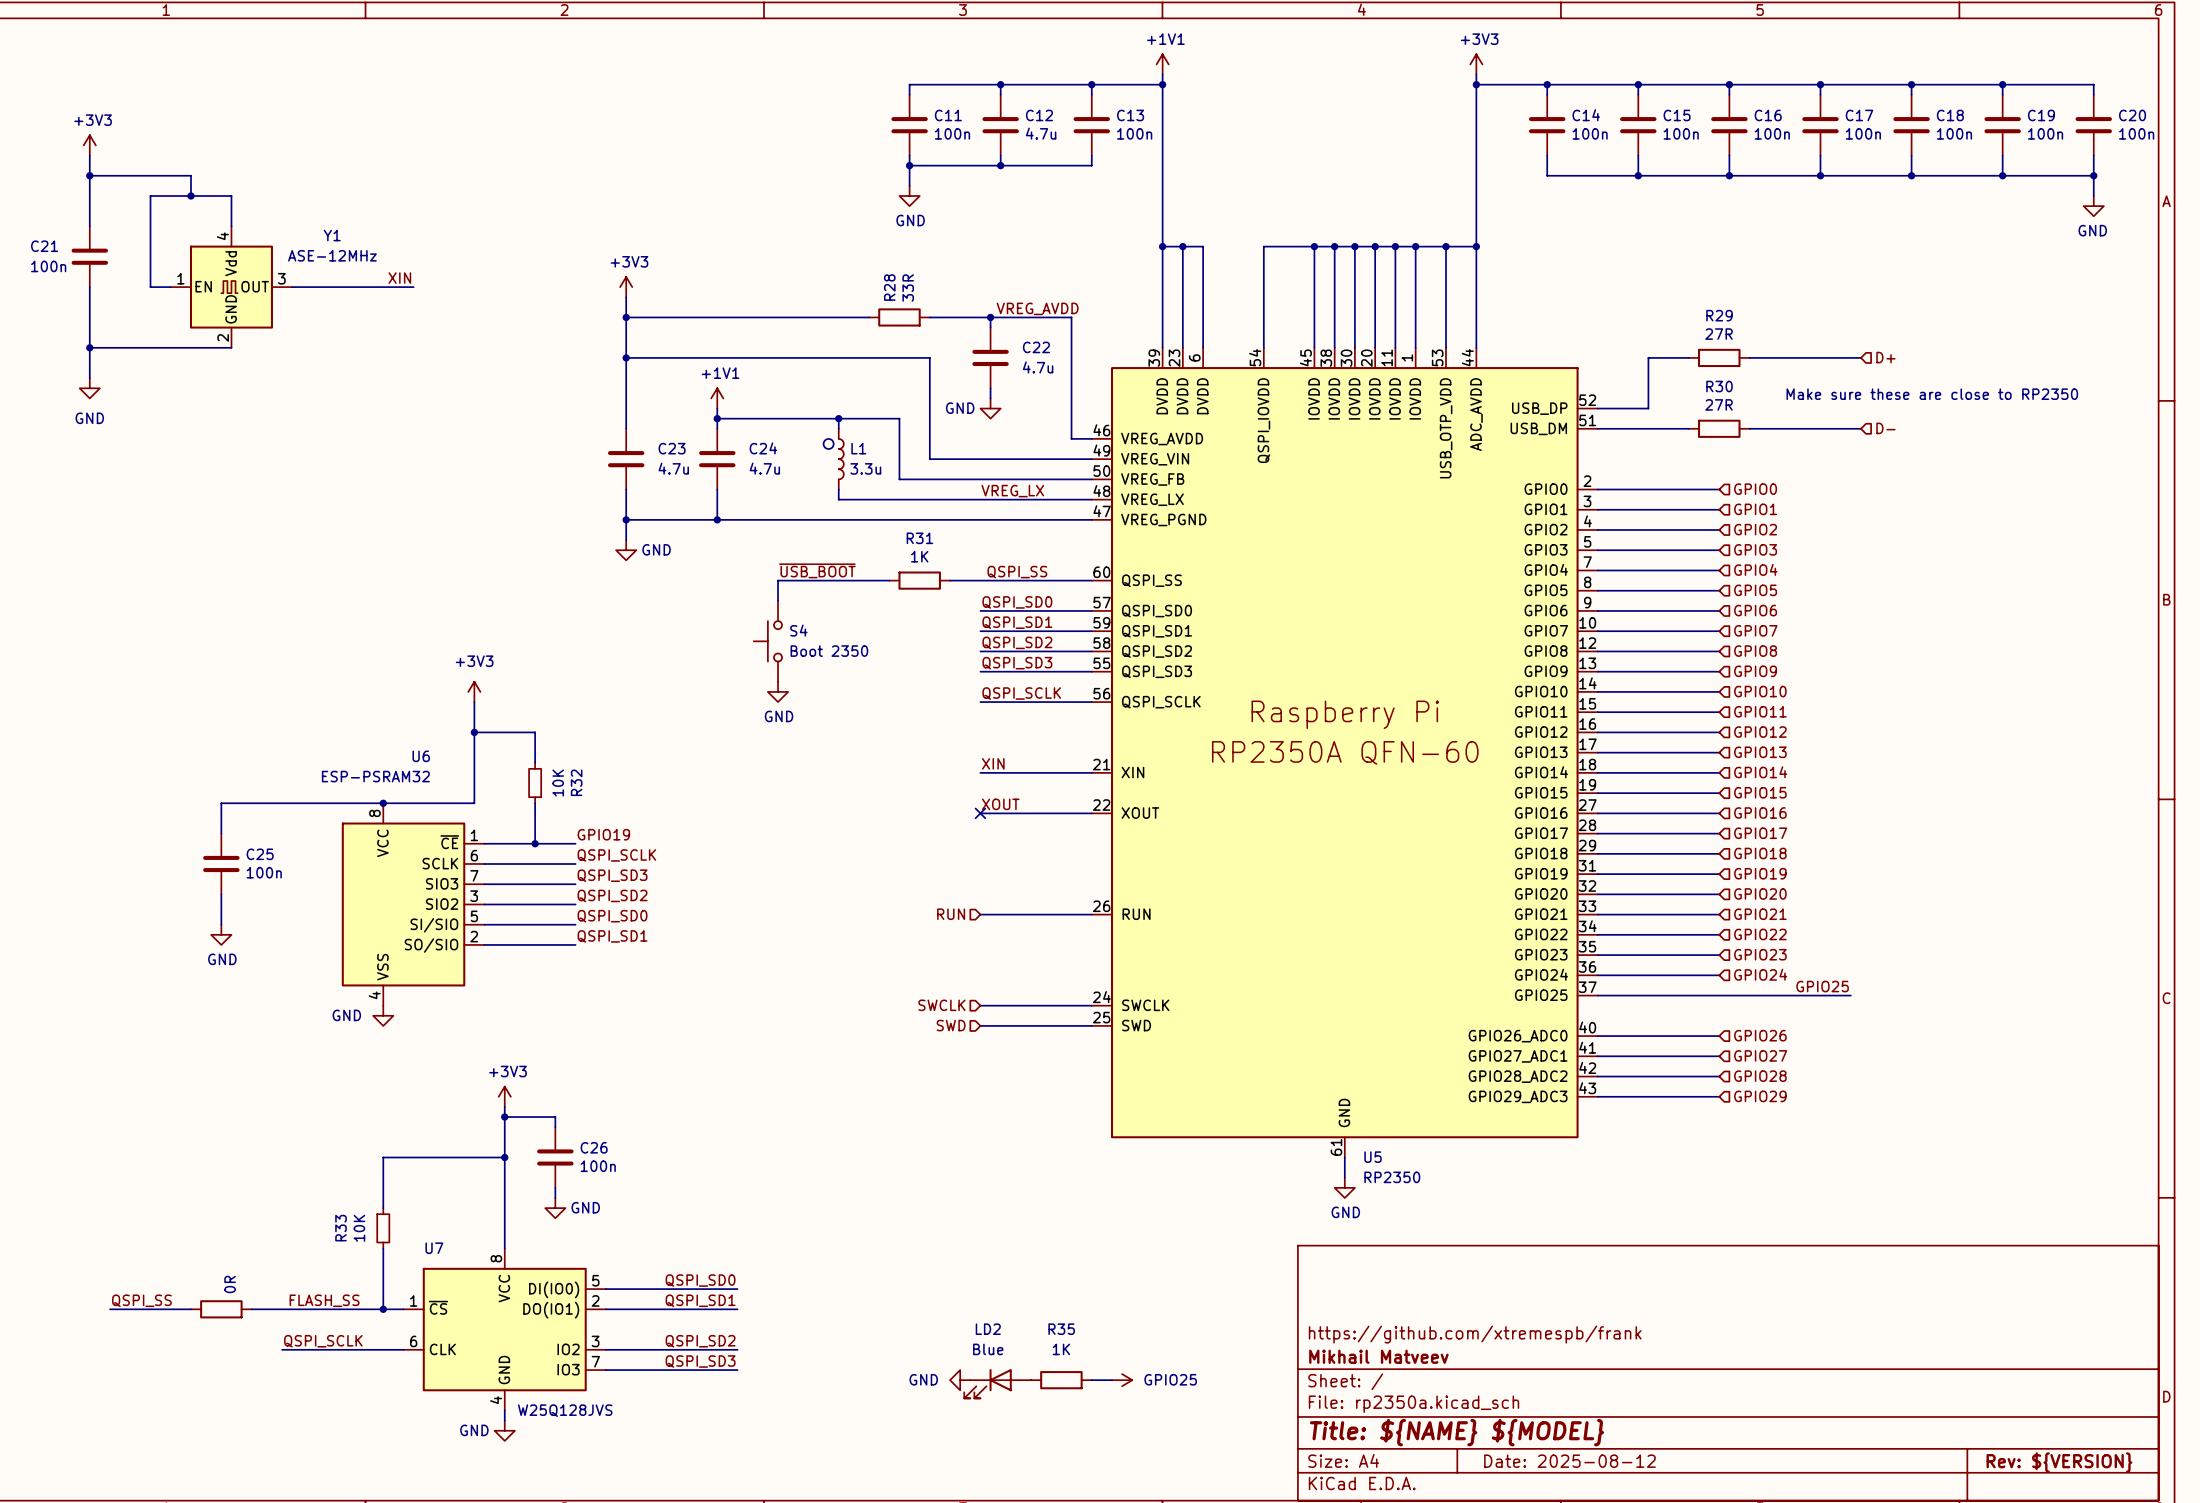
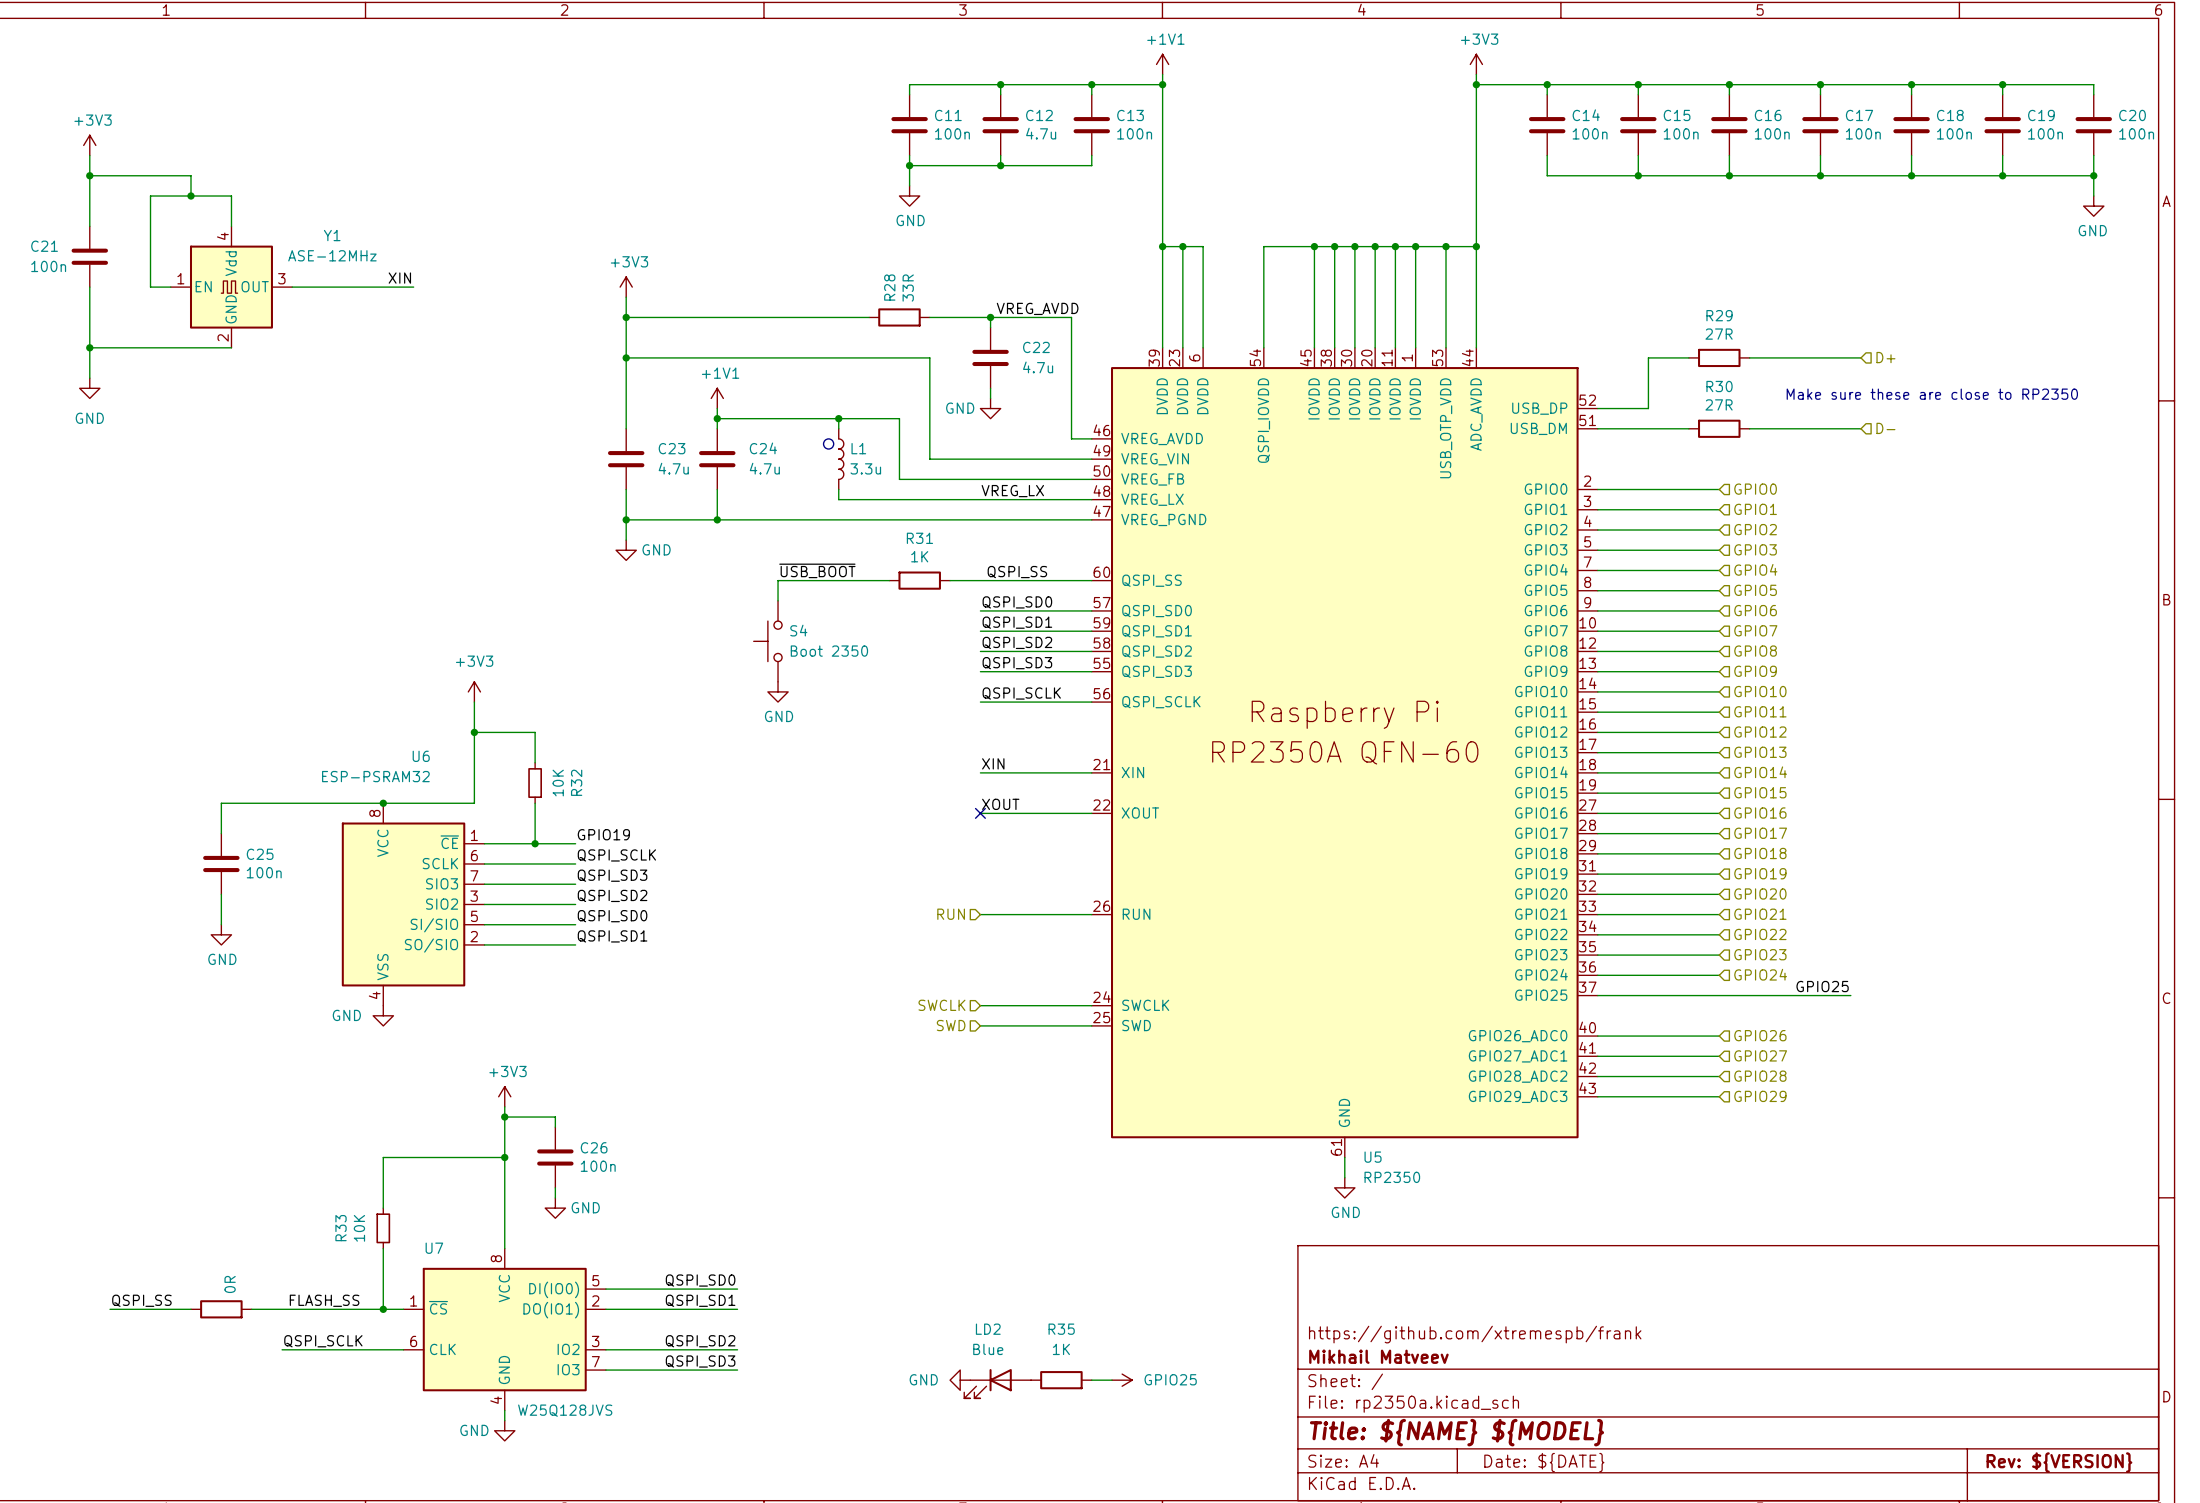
title block: Date: 2025-08-12 (1569, 1461) -> Date: ${DATE} (1544, 1462)

